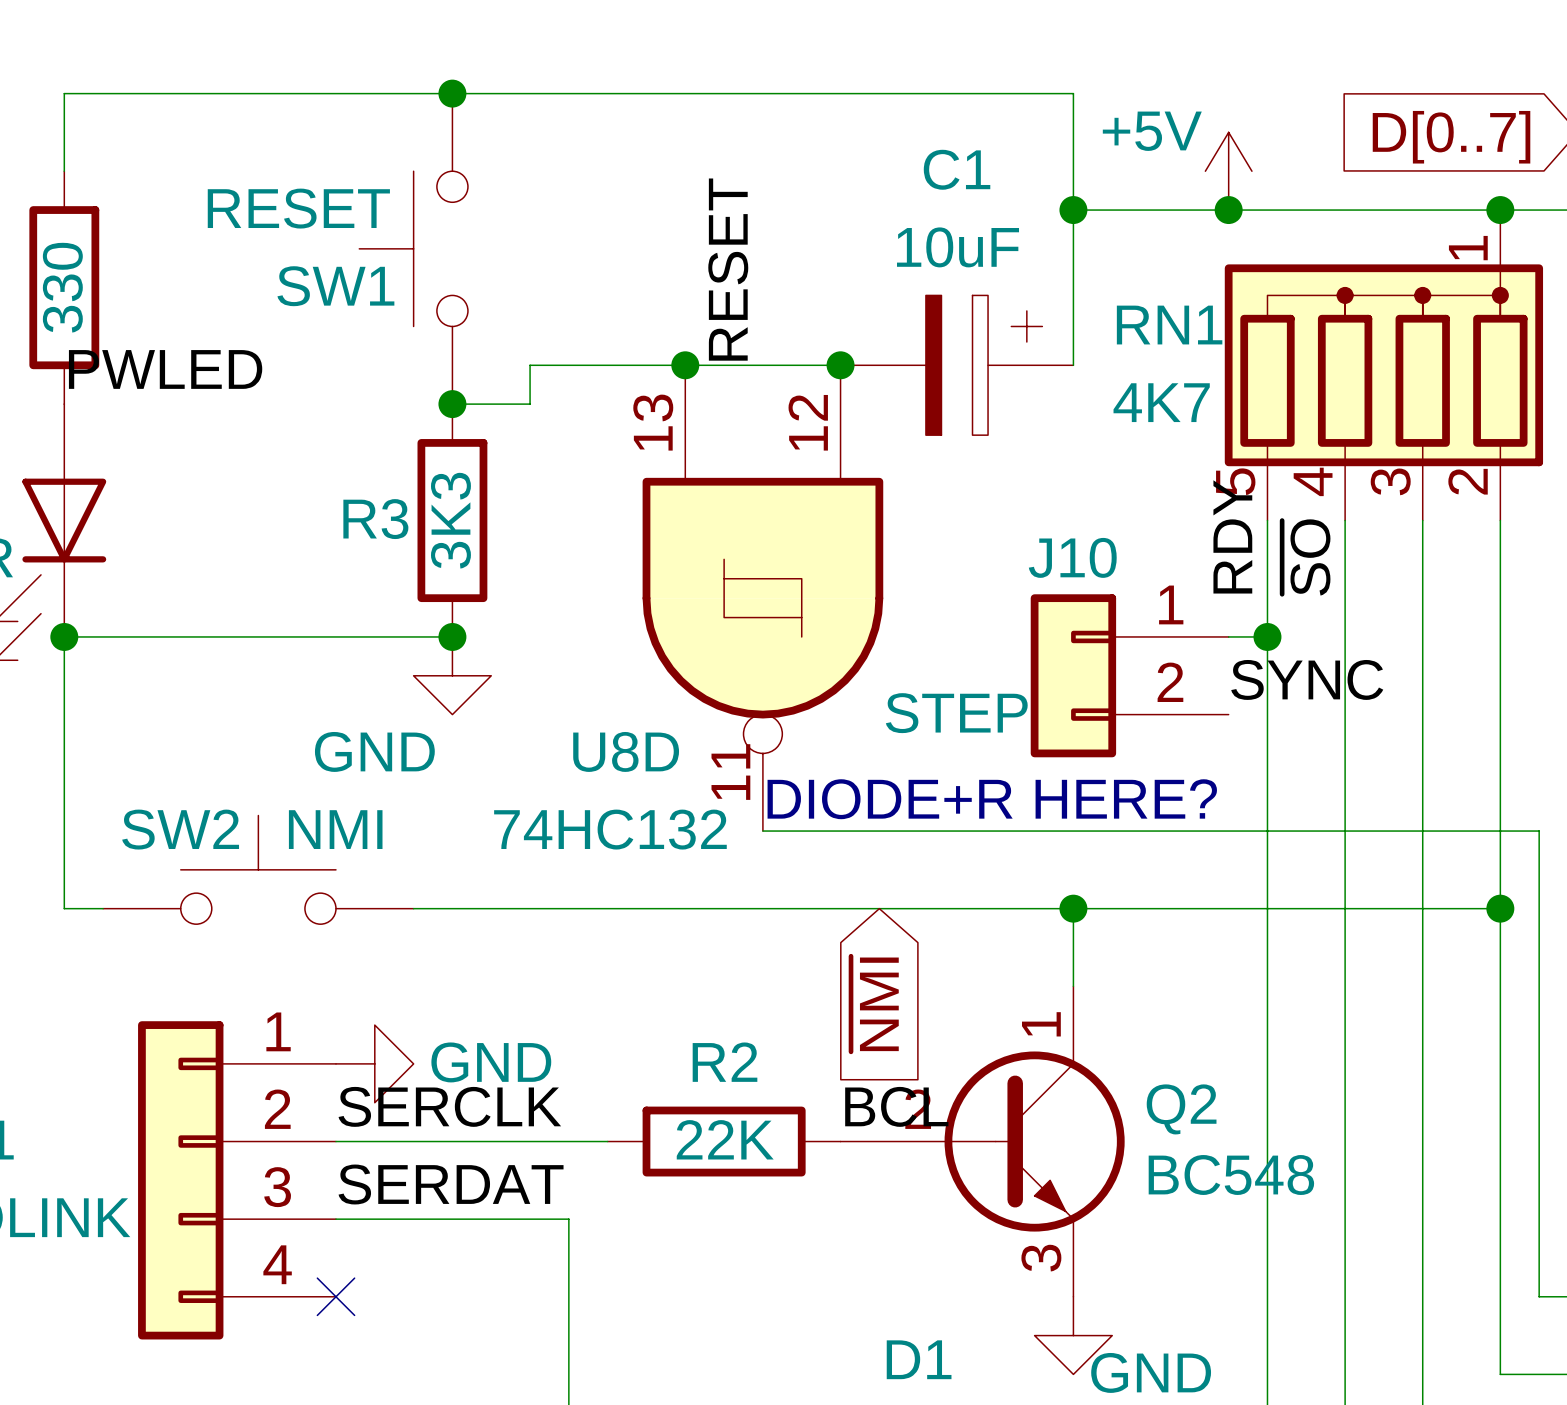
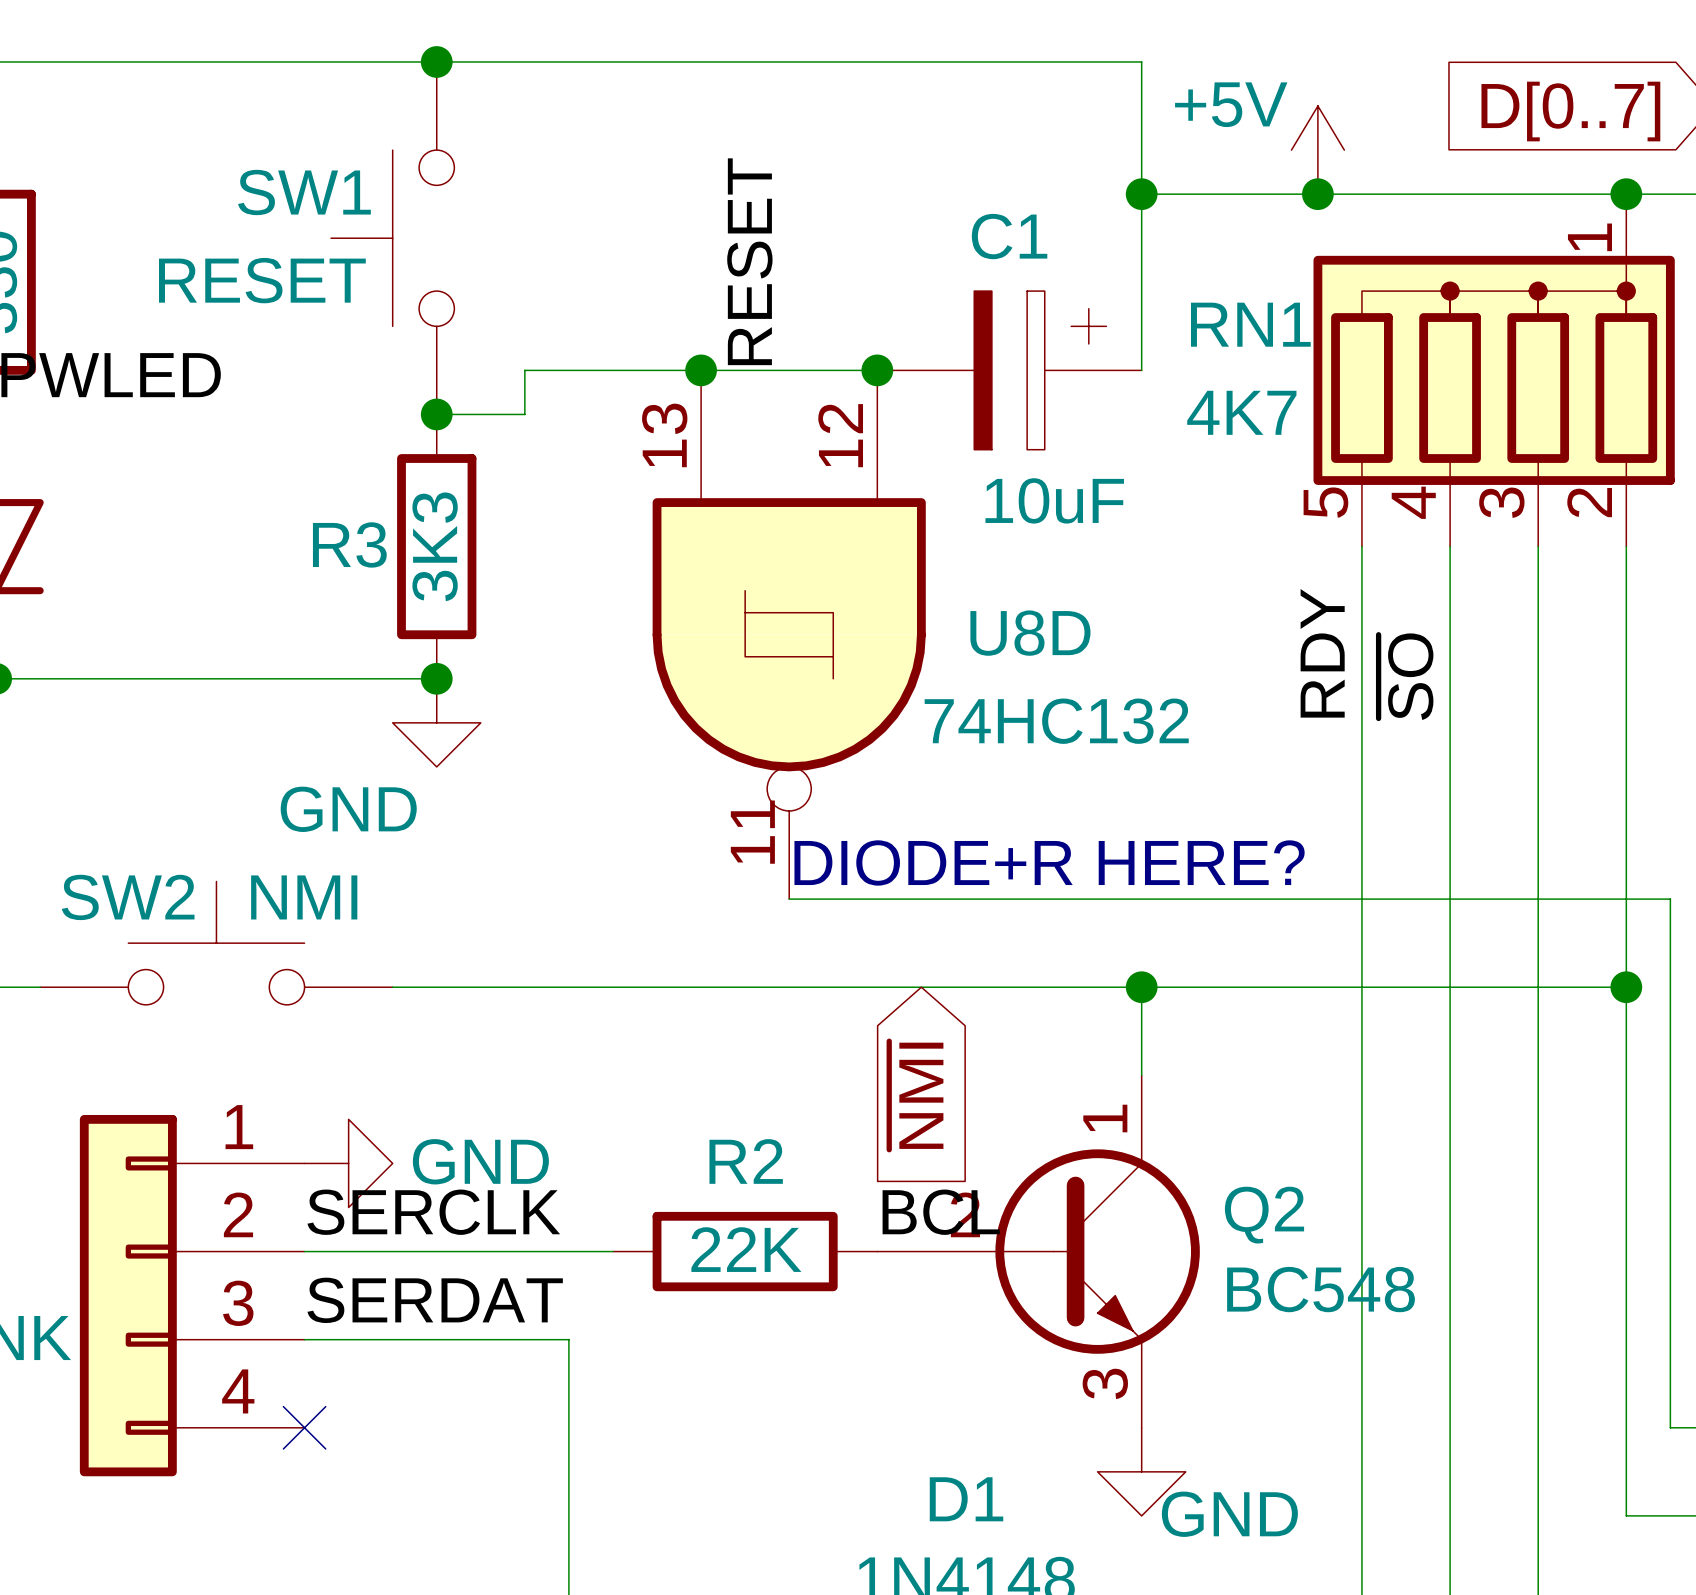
C1 name position: C1 (957, 169) -> C1 (1009, 236)
SW1 value position: RESET (298, 208) -> RESET (262, 280)
C1 value position: 10uF (958, 247) -> 10uF (1054, 500)
SW1 name position: SW1 (335, 286) -> SW1 (304, 192)
label position: RDY (1232, 536) -> RDY (1322, 653)
label position: ~{SO} (1306, 557) -> ~{SO} (1406, 676)
wire: (1228, 636) (1267, 636) -> none
junction: (1267, 636) -> none
J10: STEP (1129, 675) -> none
label: SYNC (1307, 679) -> none
U8D name position: U8D (626, 751) -> U8D (1030, 633)
U8D value position: 74HC132 (610, 829) -> 74HC132 (1056, 721)

